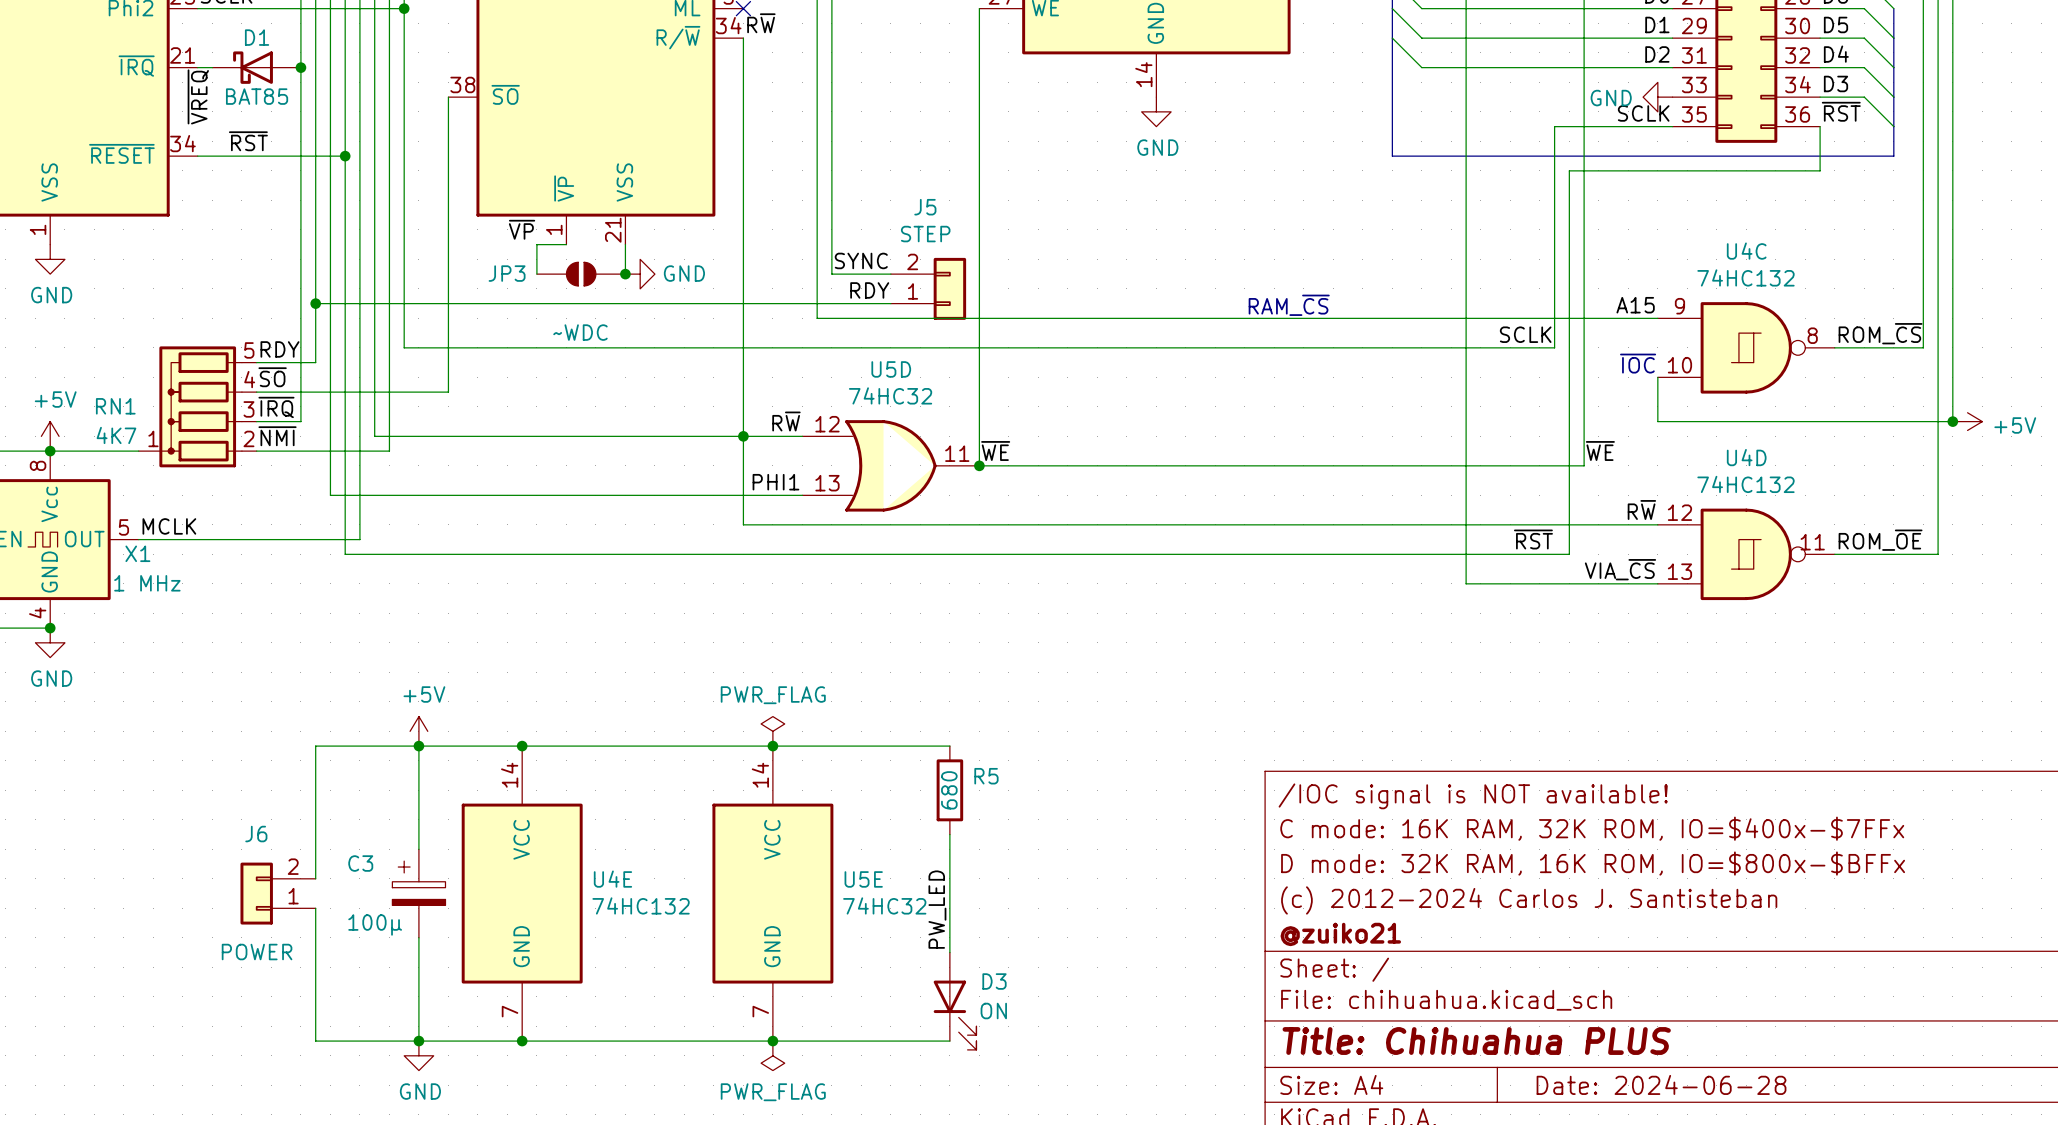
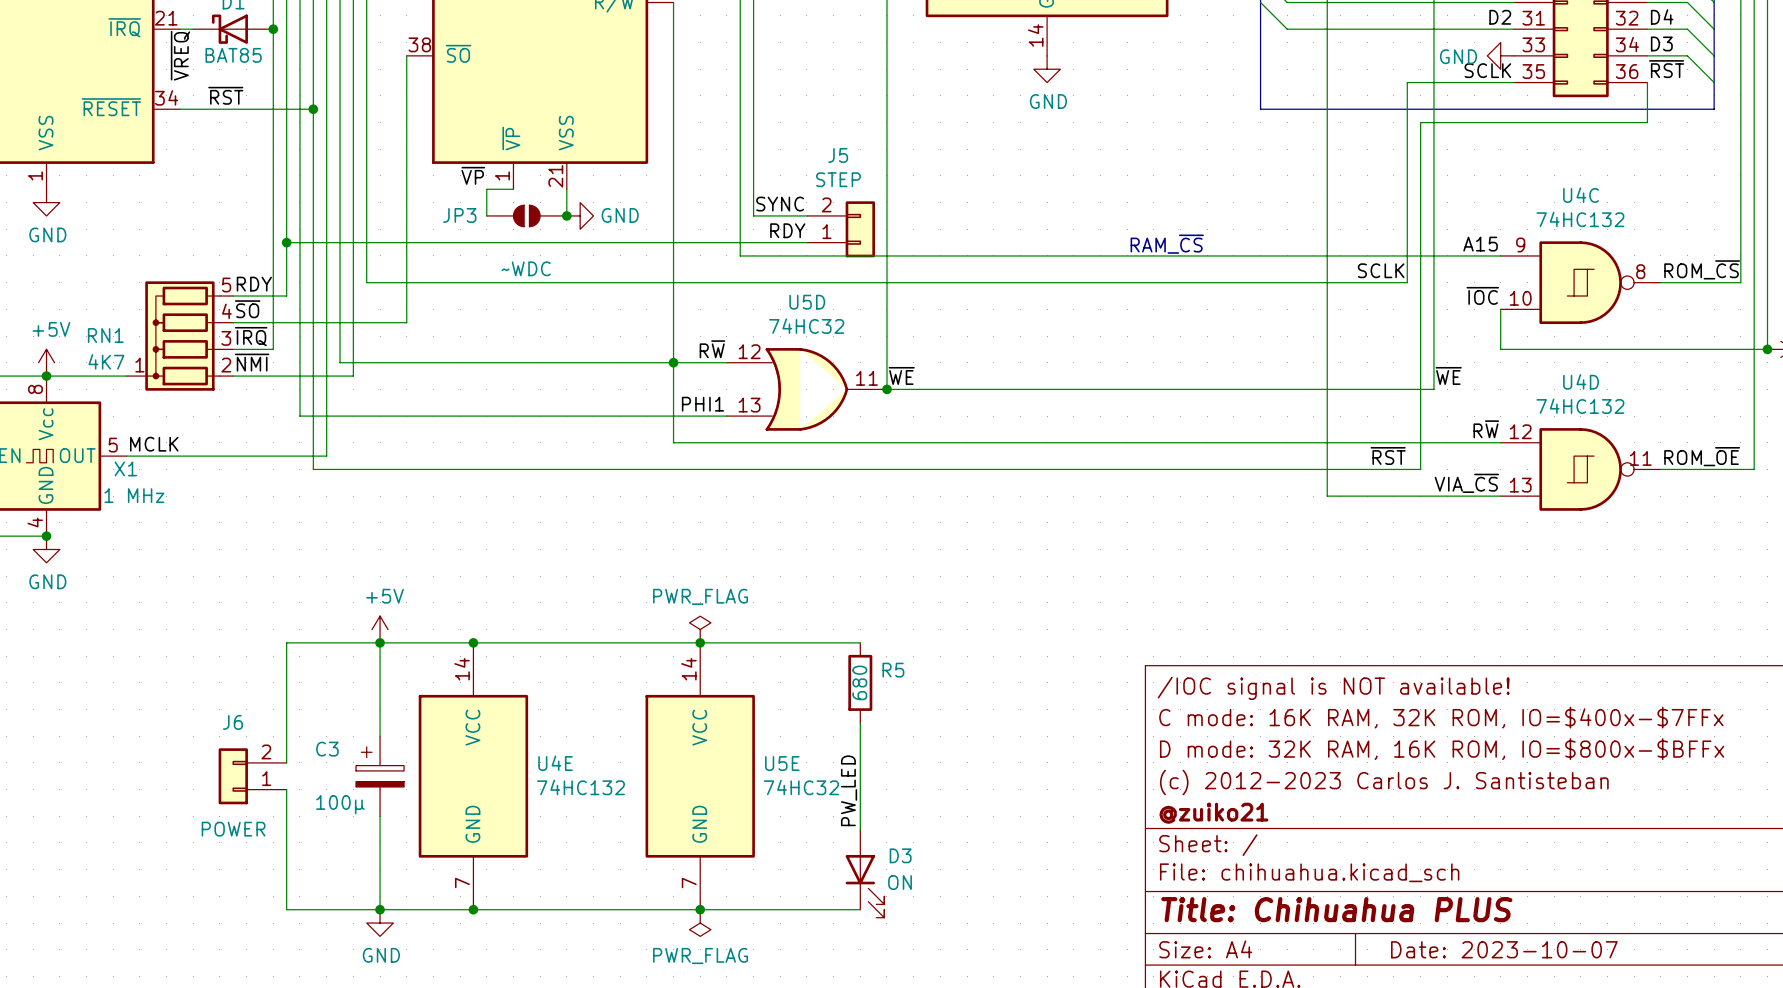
label: none -> ~{IOC} (1482, 295)
text: ~{IOC} (1638, 363) -> none
title block: (c) 2012-2024 Carlos J. Santisteban (1529, 900) -> (c) 2012-2023 Carlos J. Santisteban (1384, 782)
title block: Date: 2024-06-28 (1661, 1084) -> Date: 2023-10-07 (1504, 949)

